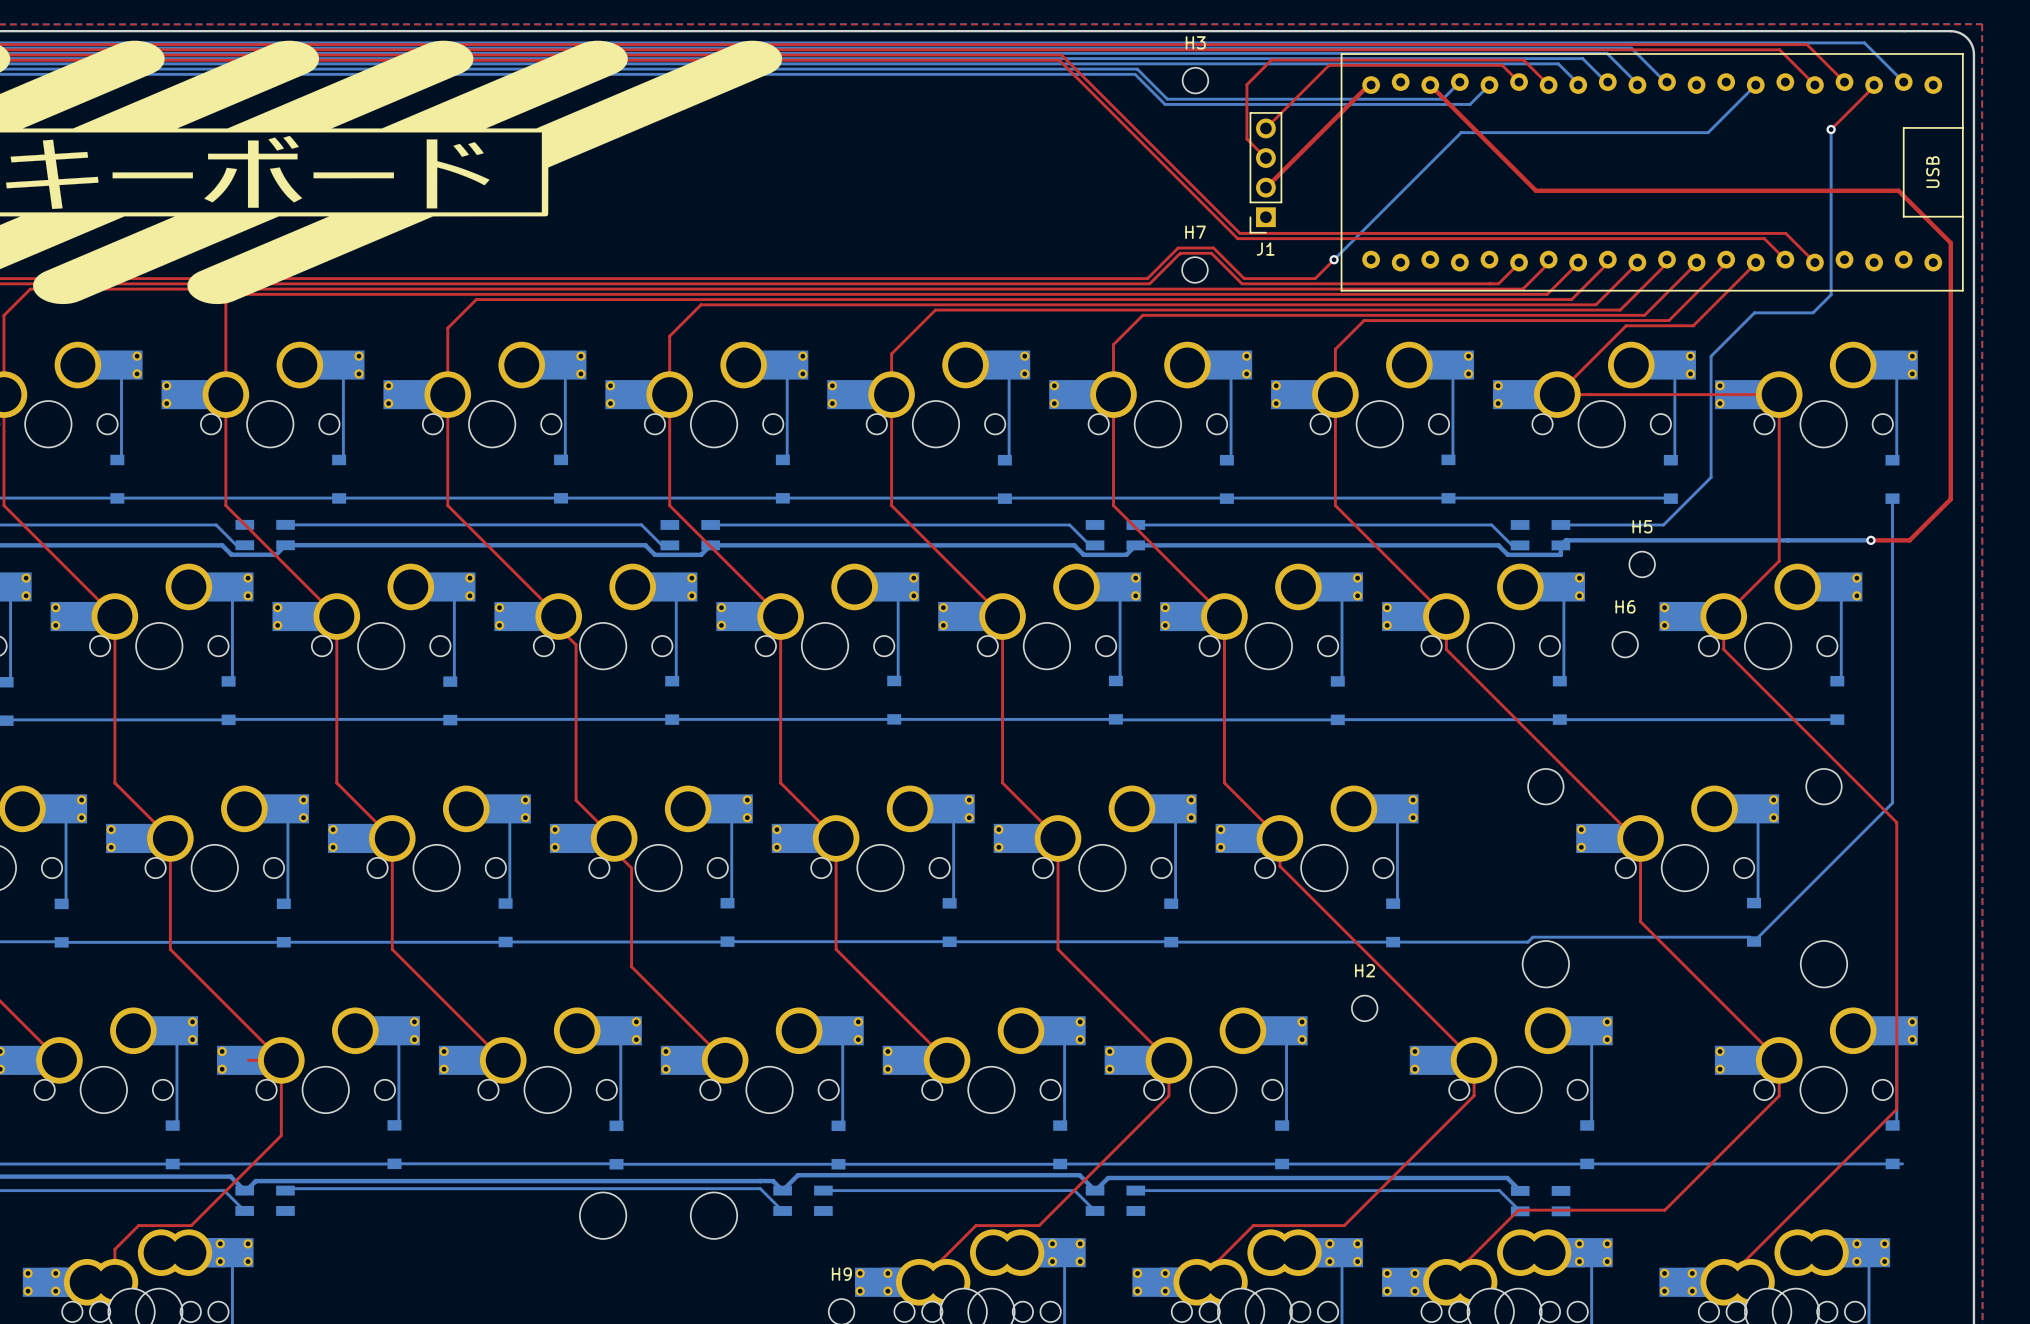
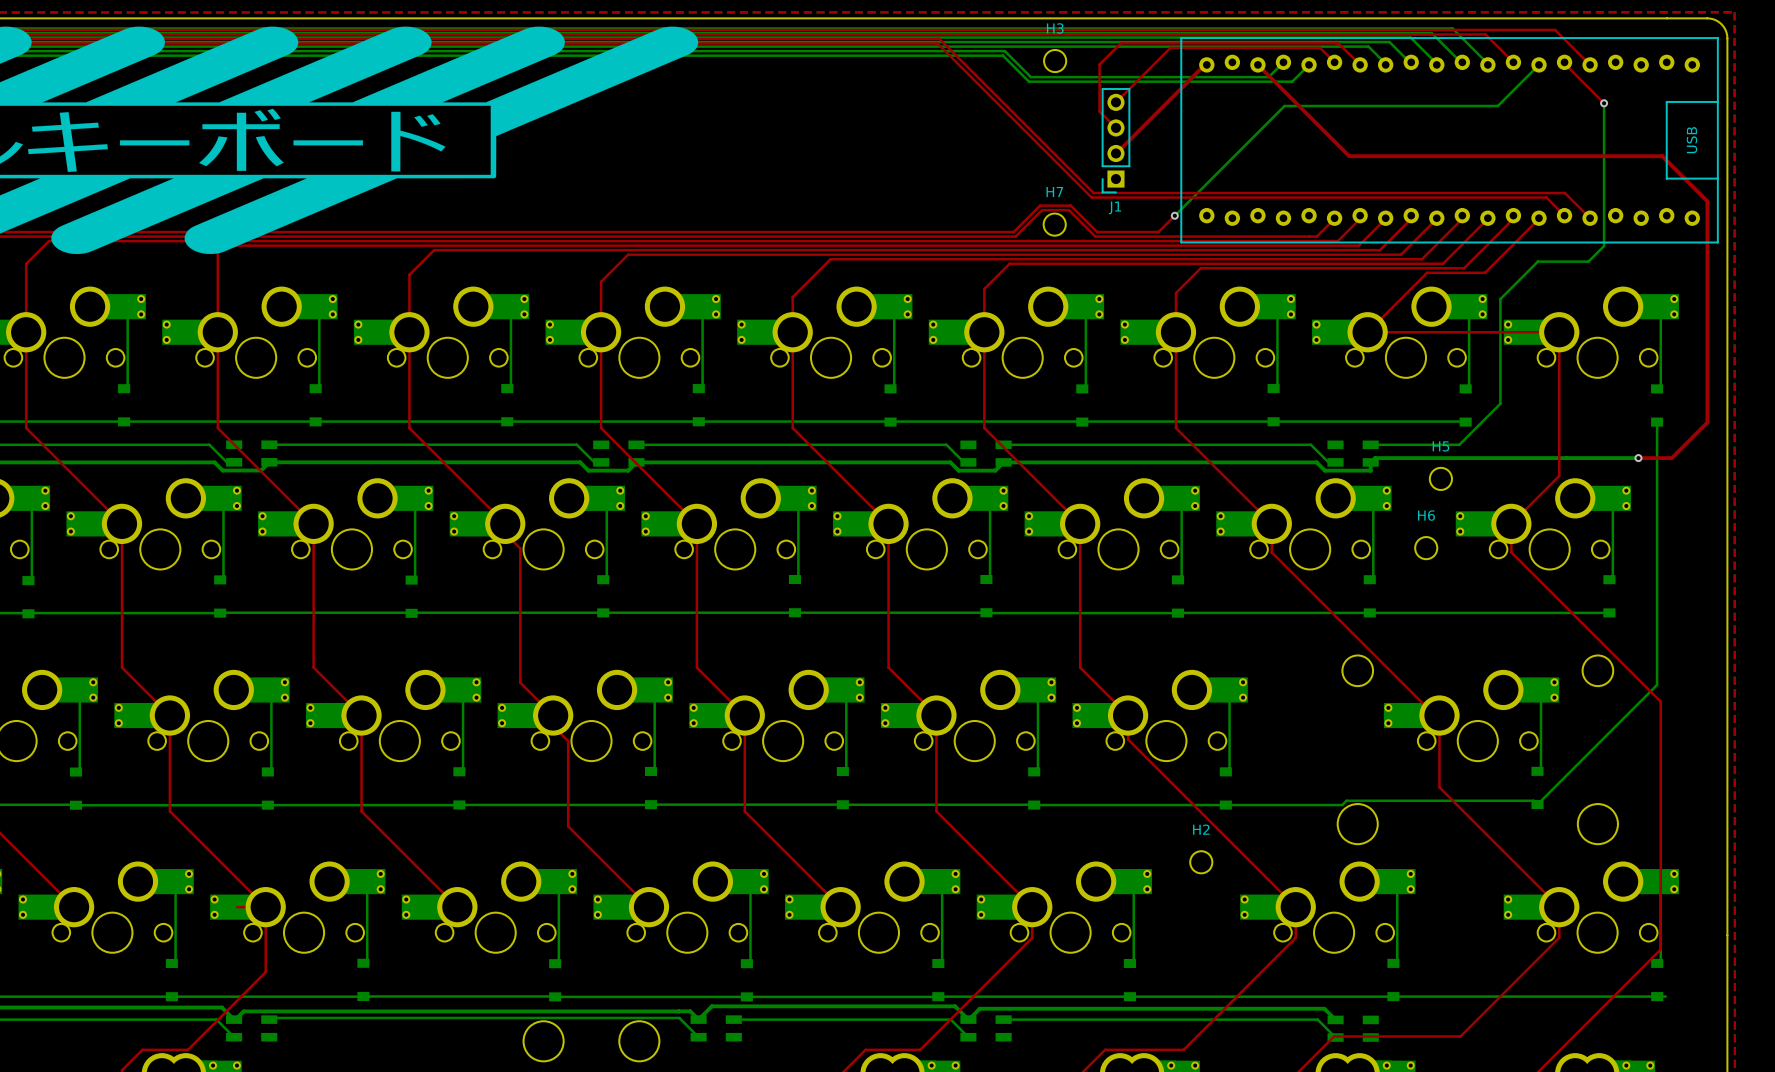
bottom track: (1655, 42) (1864, 42) (1903, 82) -> (1452, 28) (1488, 64)
top track: (1774, 44) (1807, 44) (1844, 82) -> (1555, 29) (1559, 34)
top track: (1693, 49) (1779, 49) -> (1485, 34) (1513, 62)
top track: (1874, 85) (1831, 129) -> (1565, 64) (1604, 103)

